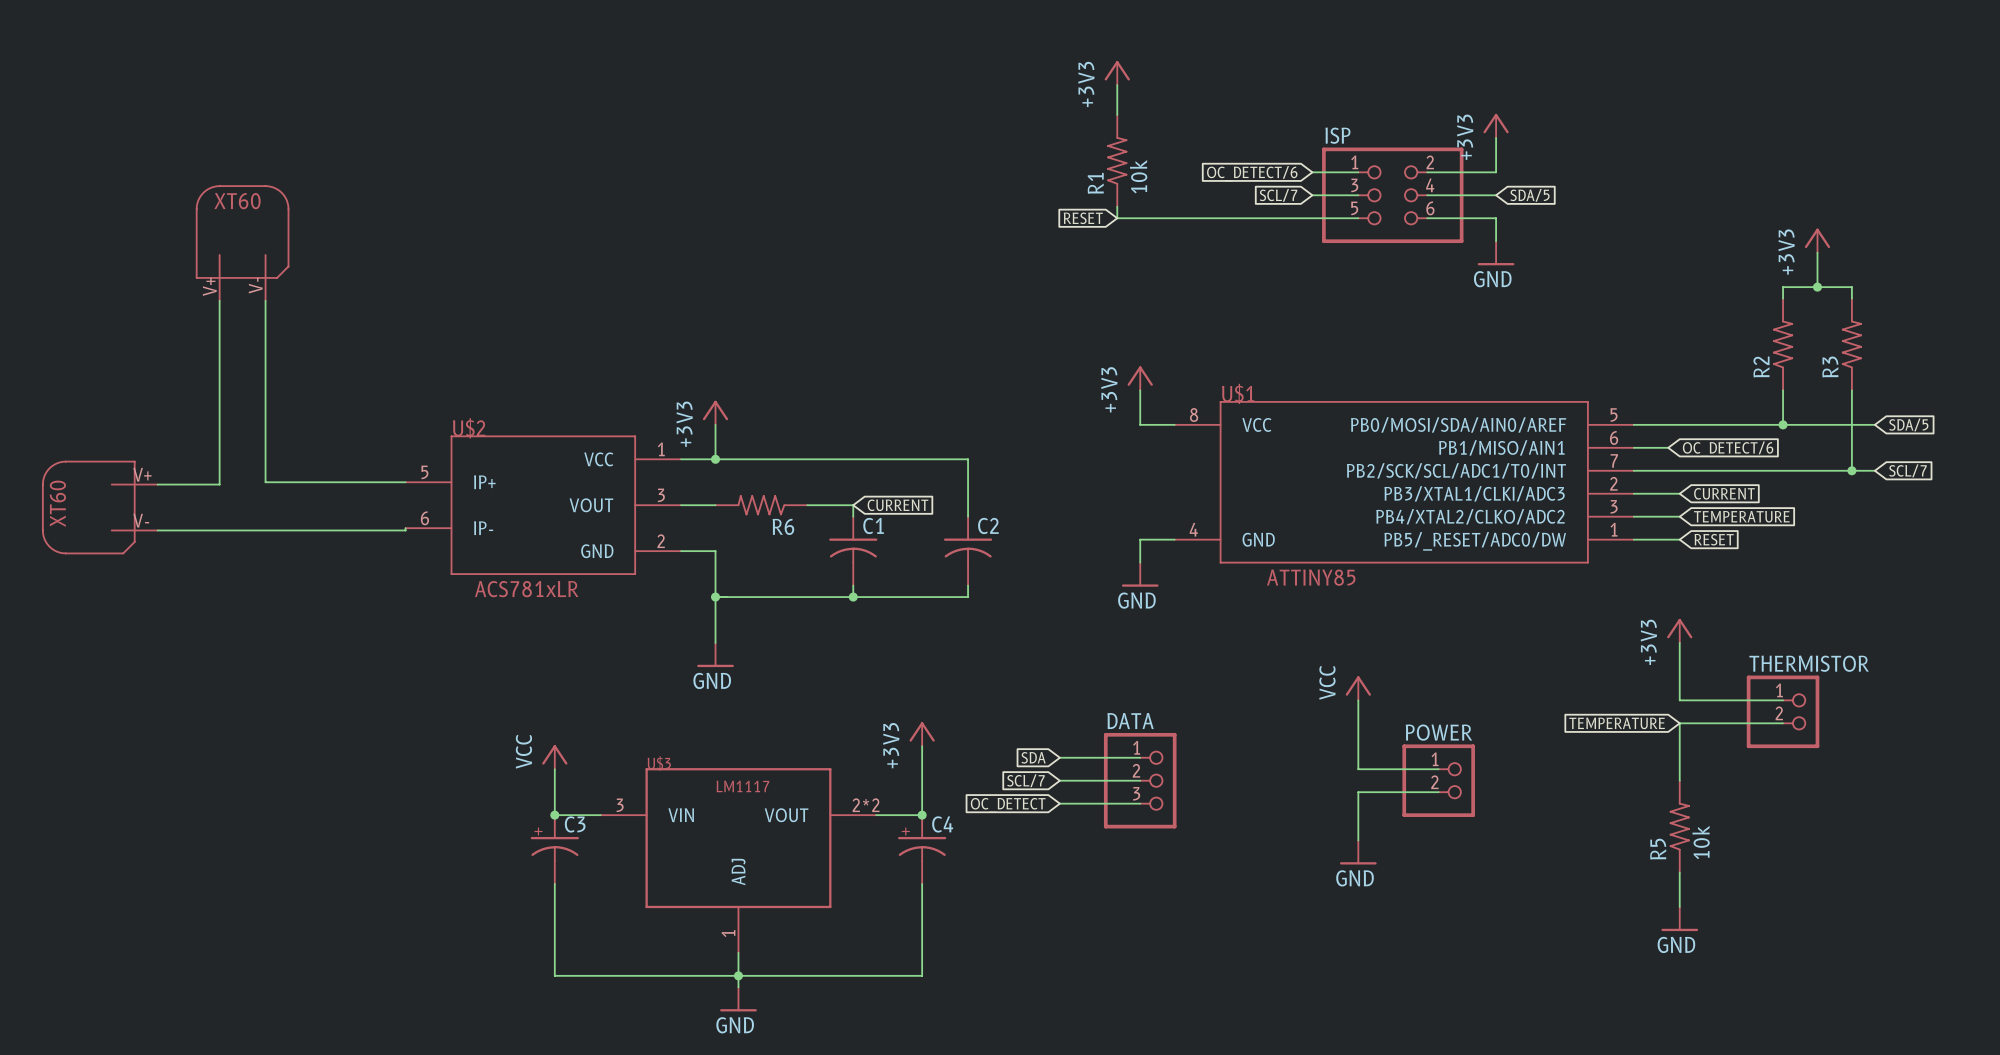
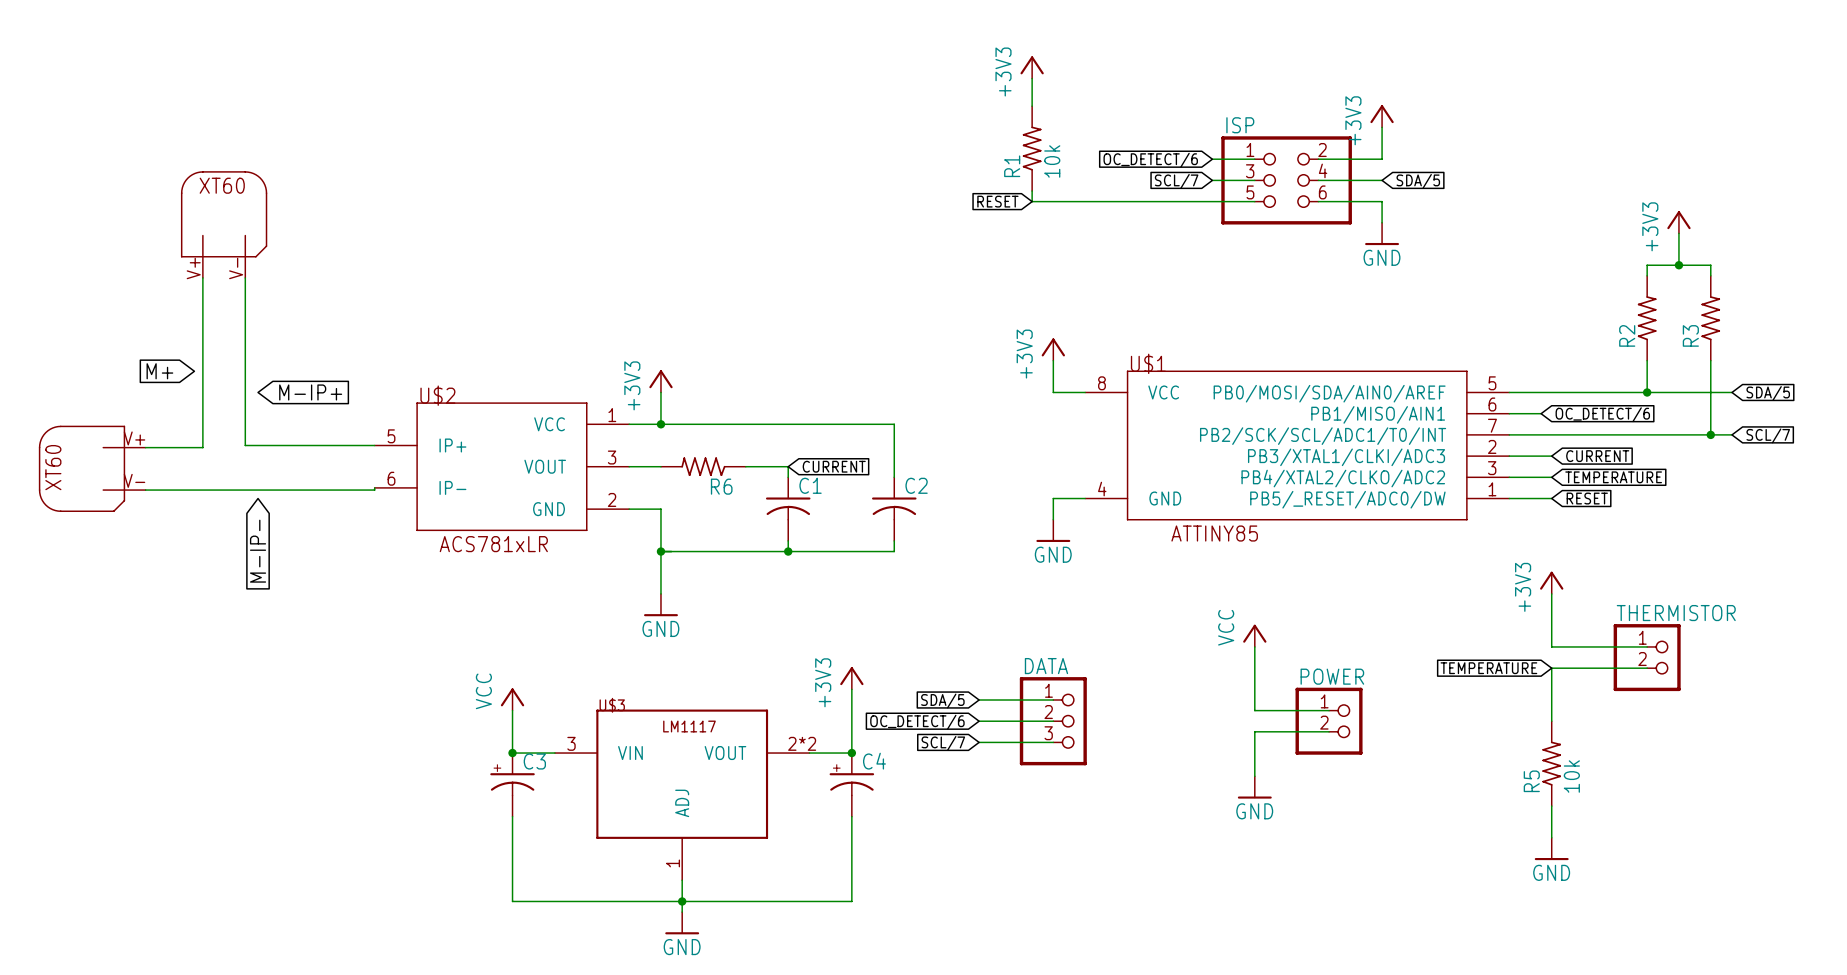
global label: none -> M+ (159, 371)
global label: none -> M-IP+ (310, 392)
global label: none -> M-IP- (258, 551)
global label: SDA (1033, 757) -> SDA/5 (942, 701)
global label: SCL/7 (1025, 780) -> OC_DETECT/6 (917, 722)
global label: OC_DETECT (1008, 805) -> SCL/7 (943, 743)

